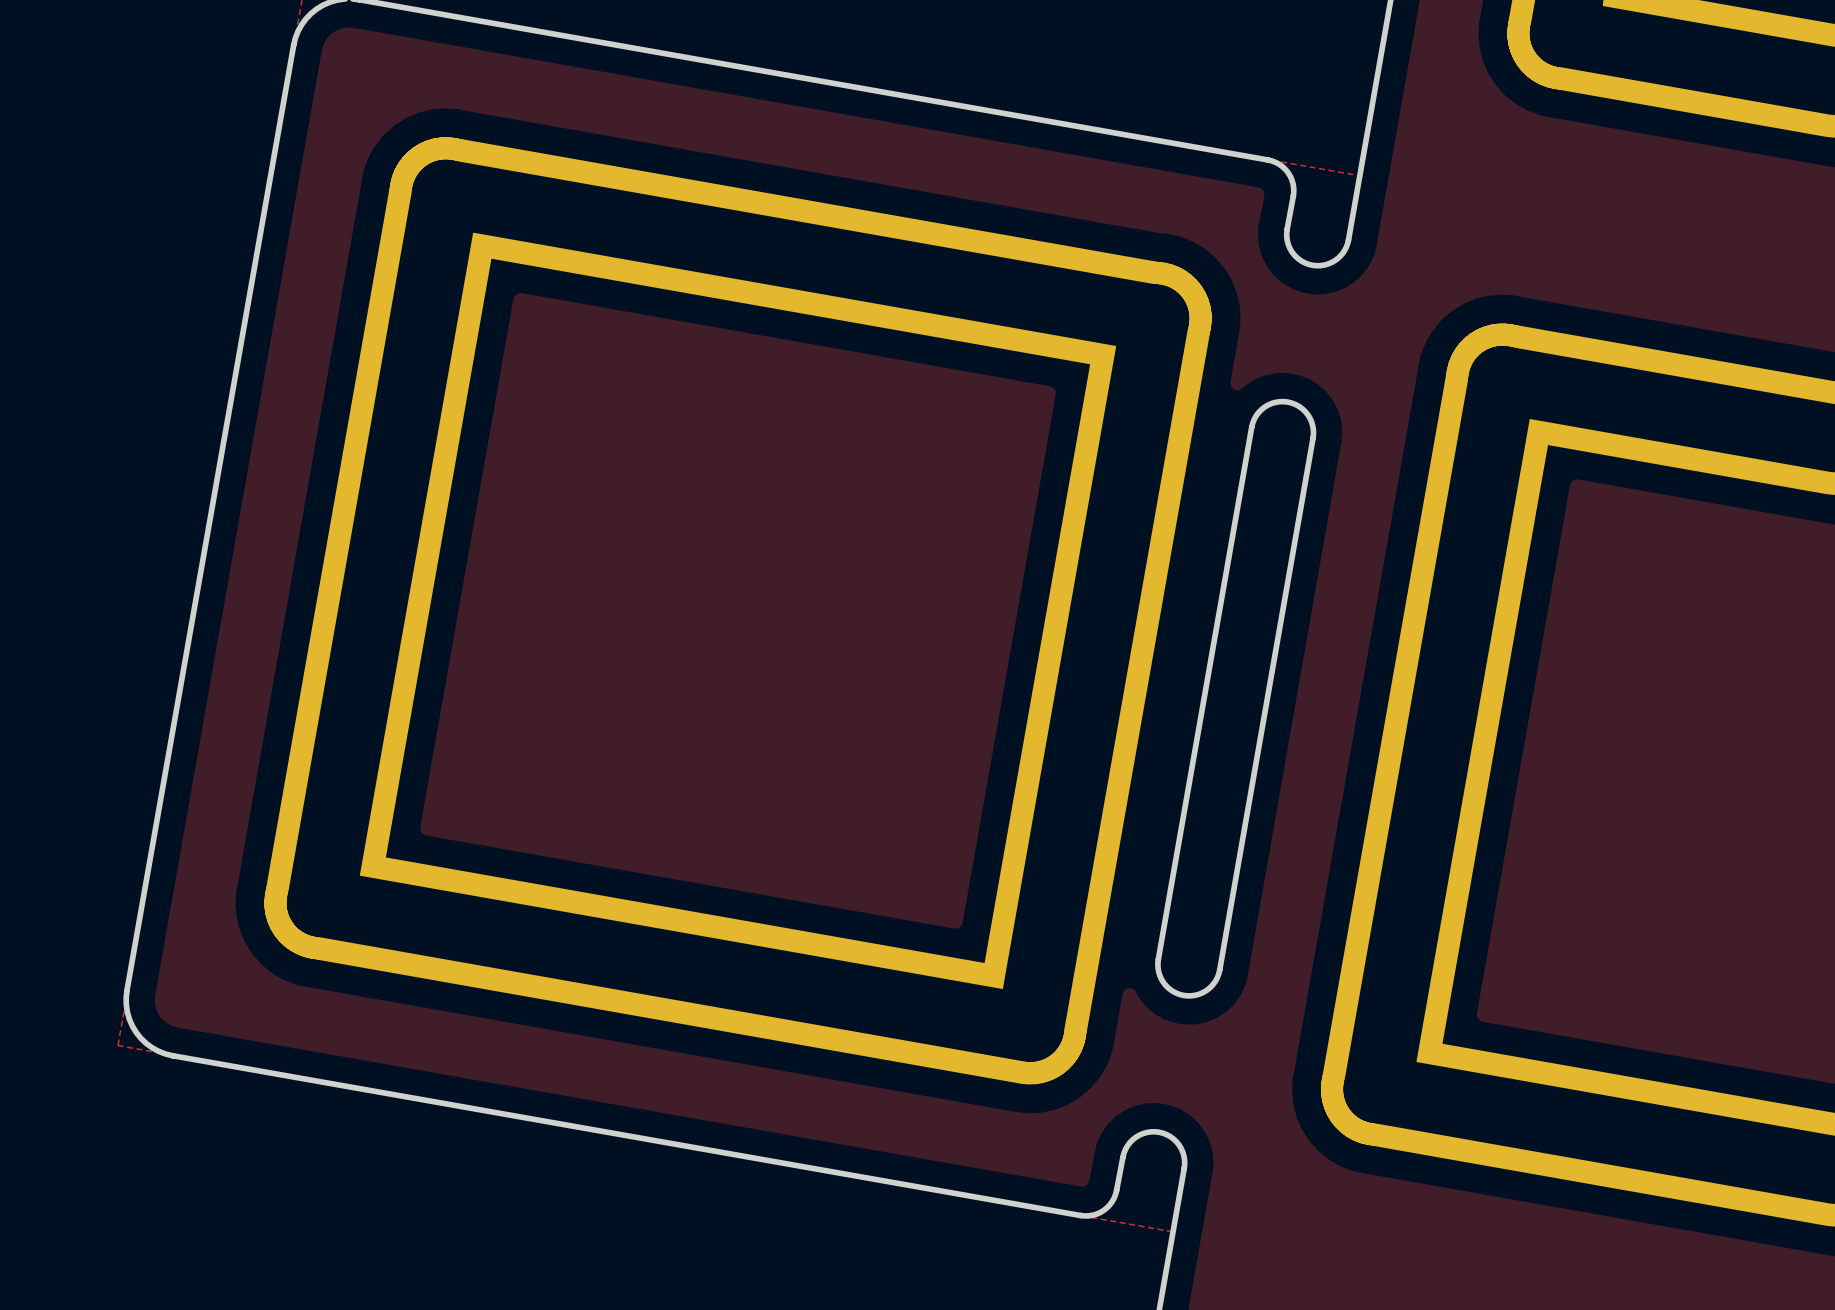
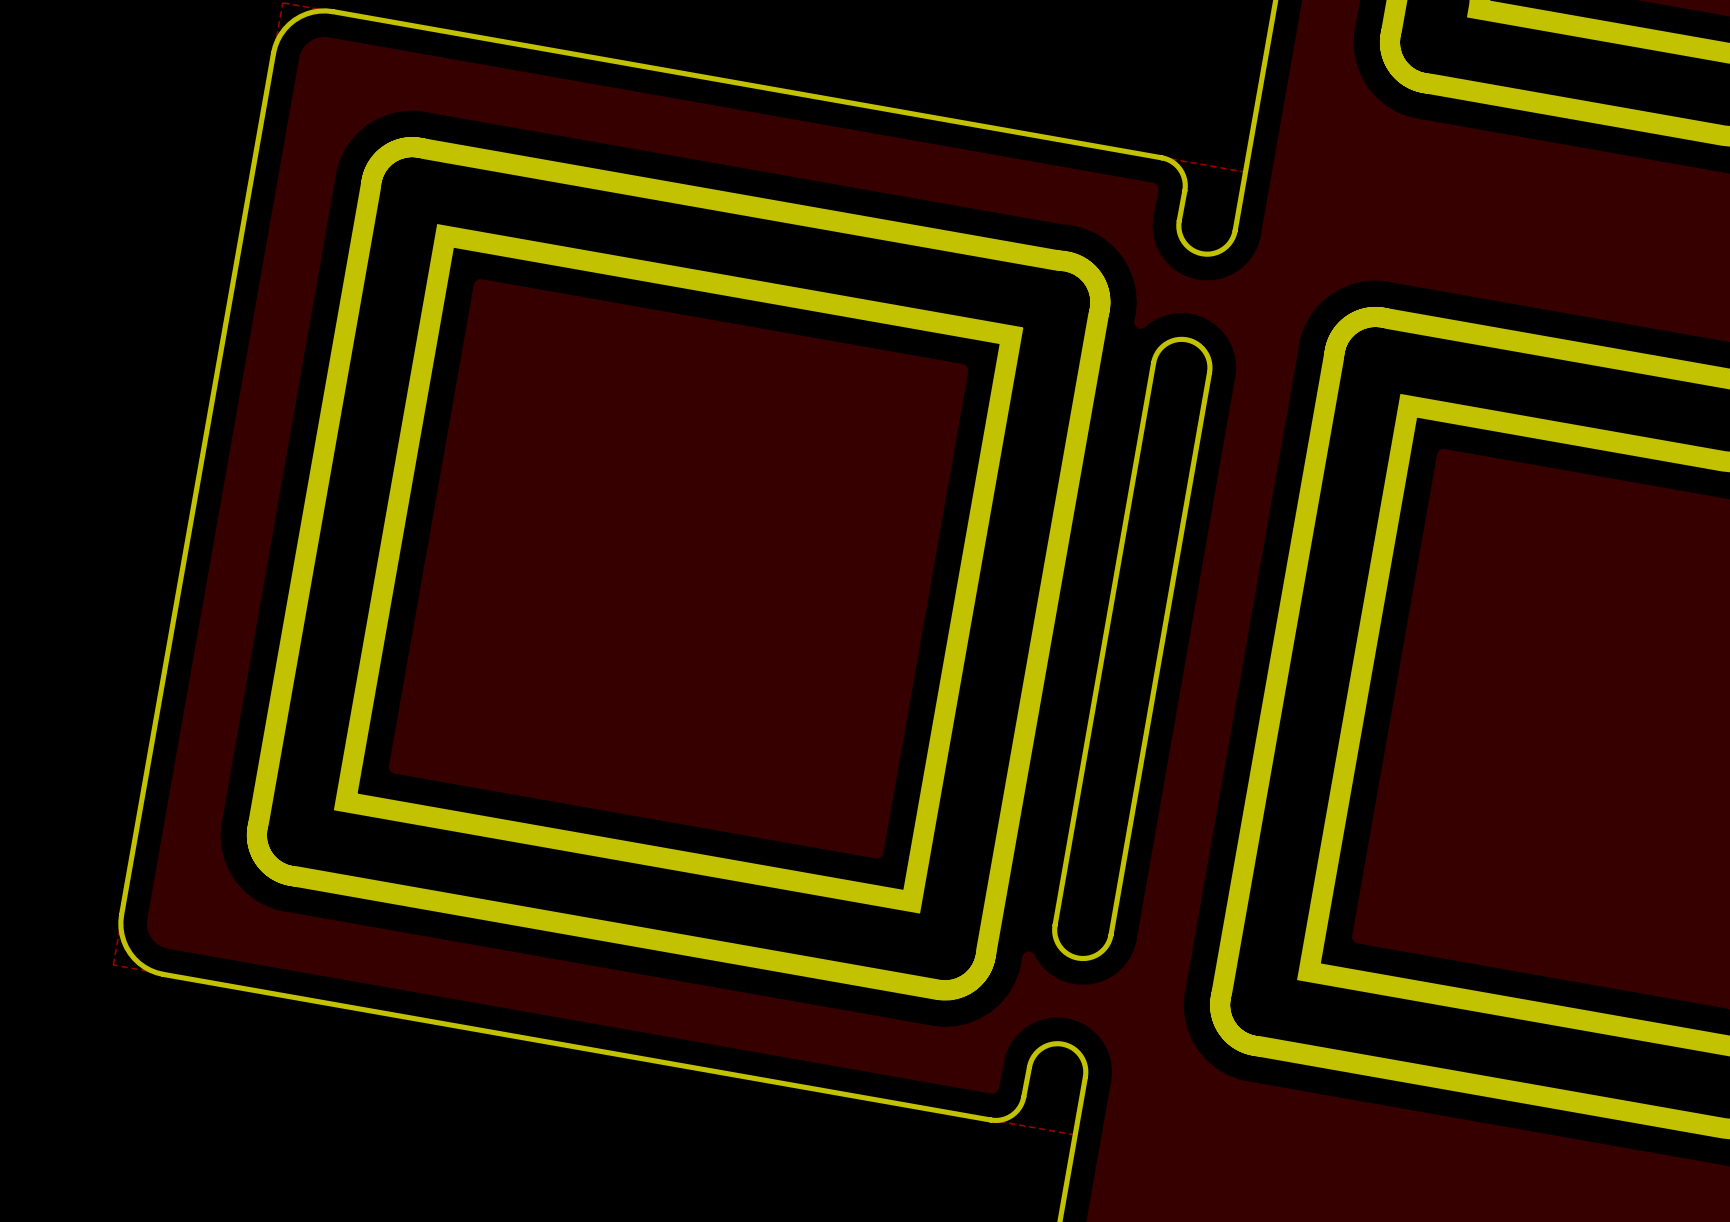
board edge: (1251, 427) (1158, 959) (1158, 971) (1163, 982) (1172, 991) (1183, 995) (1195, 995) (1206, 990) (1215, 981) (1219, 970) (1313, 438) (1312, 425) (1307, 414) (1299, 406) (1287, 402) (1275, 402) (1264, 407) (1256, 416) (1251, 427) -> (1153, 362) (1055, 925) (1055, 936) (1059, 946) (1067, 954) (1078, 958) (1089, 957) (1099, 953) (1107, 945) (1111, 935) (1209, 372) (1209, 361) (1204, 351) (1196, 343) (1186, 339) (1175, 340) (1165, 344) (1157, 352) (1153, 362)

